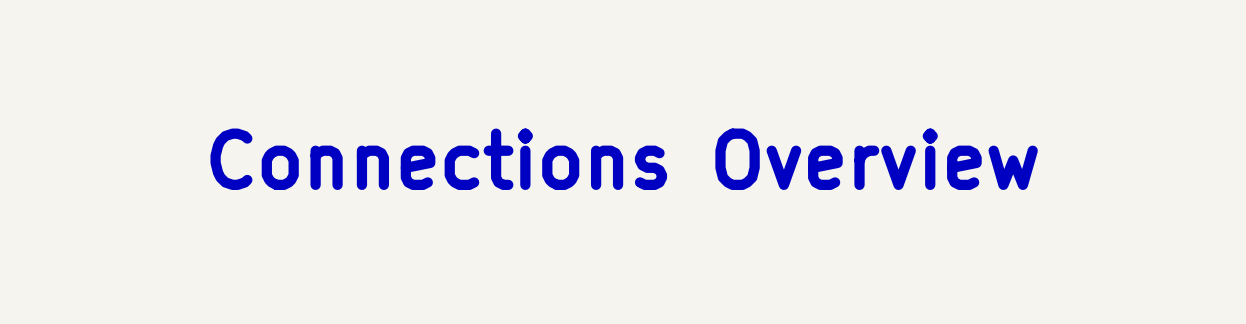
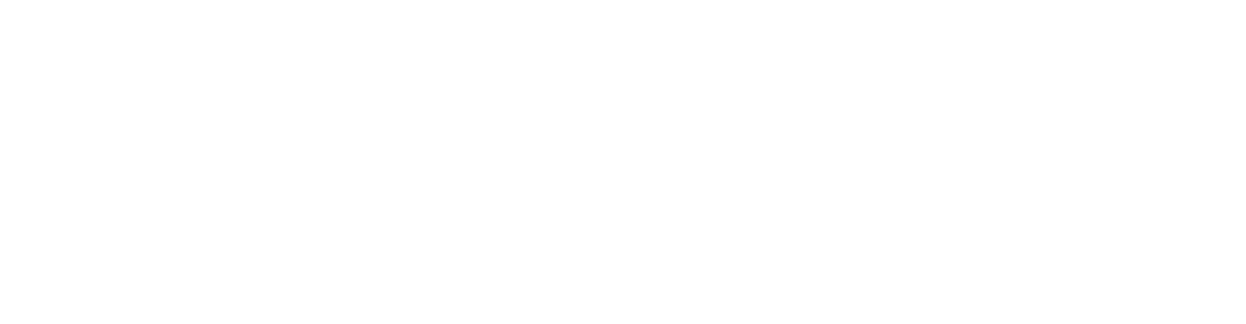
text: Connections Overview (624, 159) -> none

